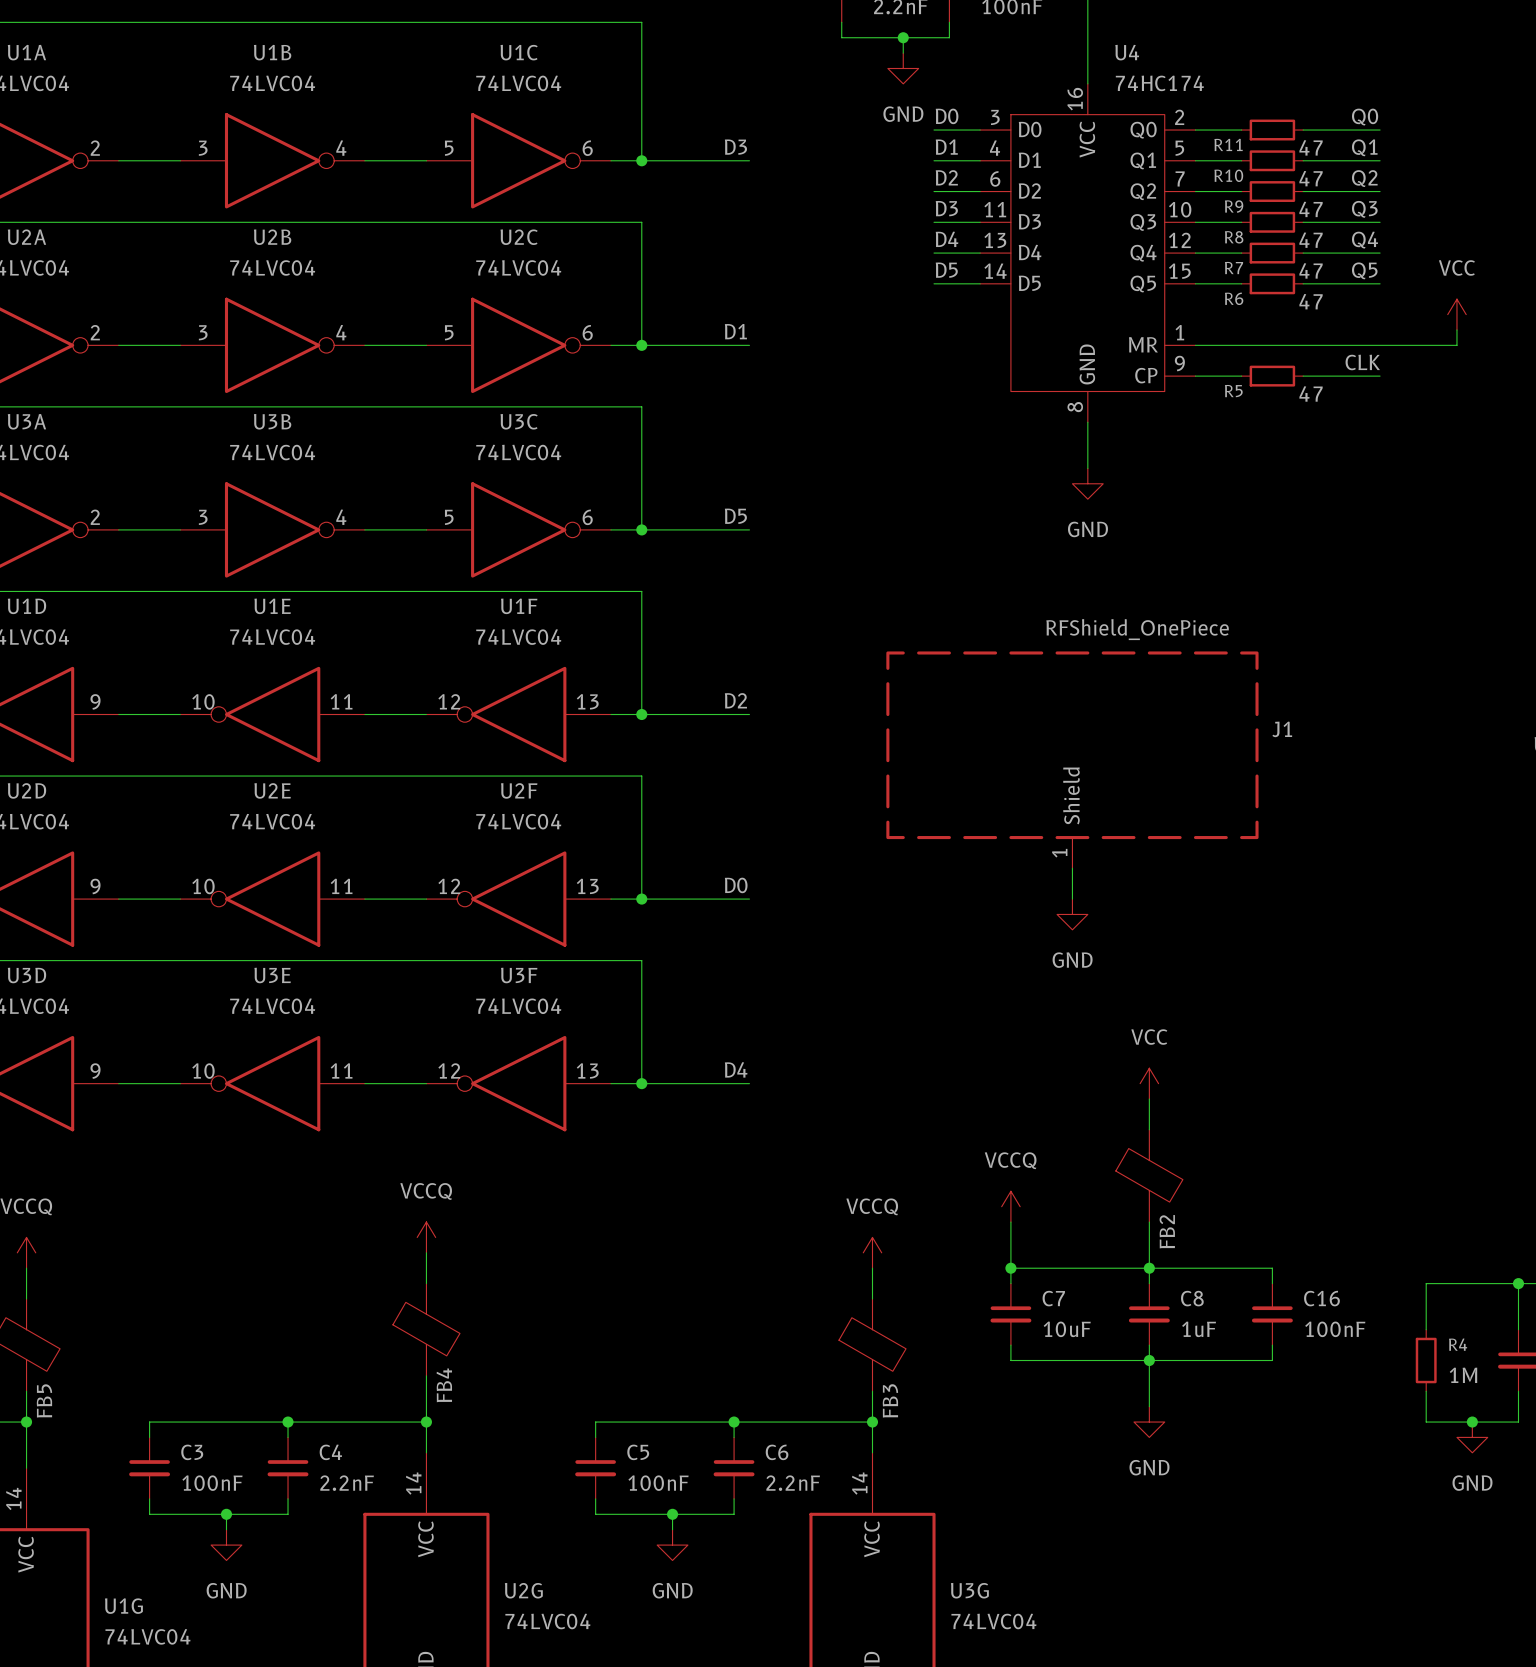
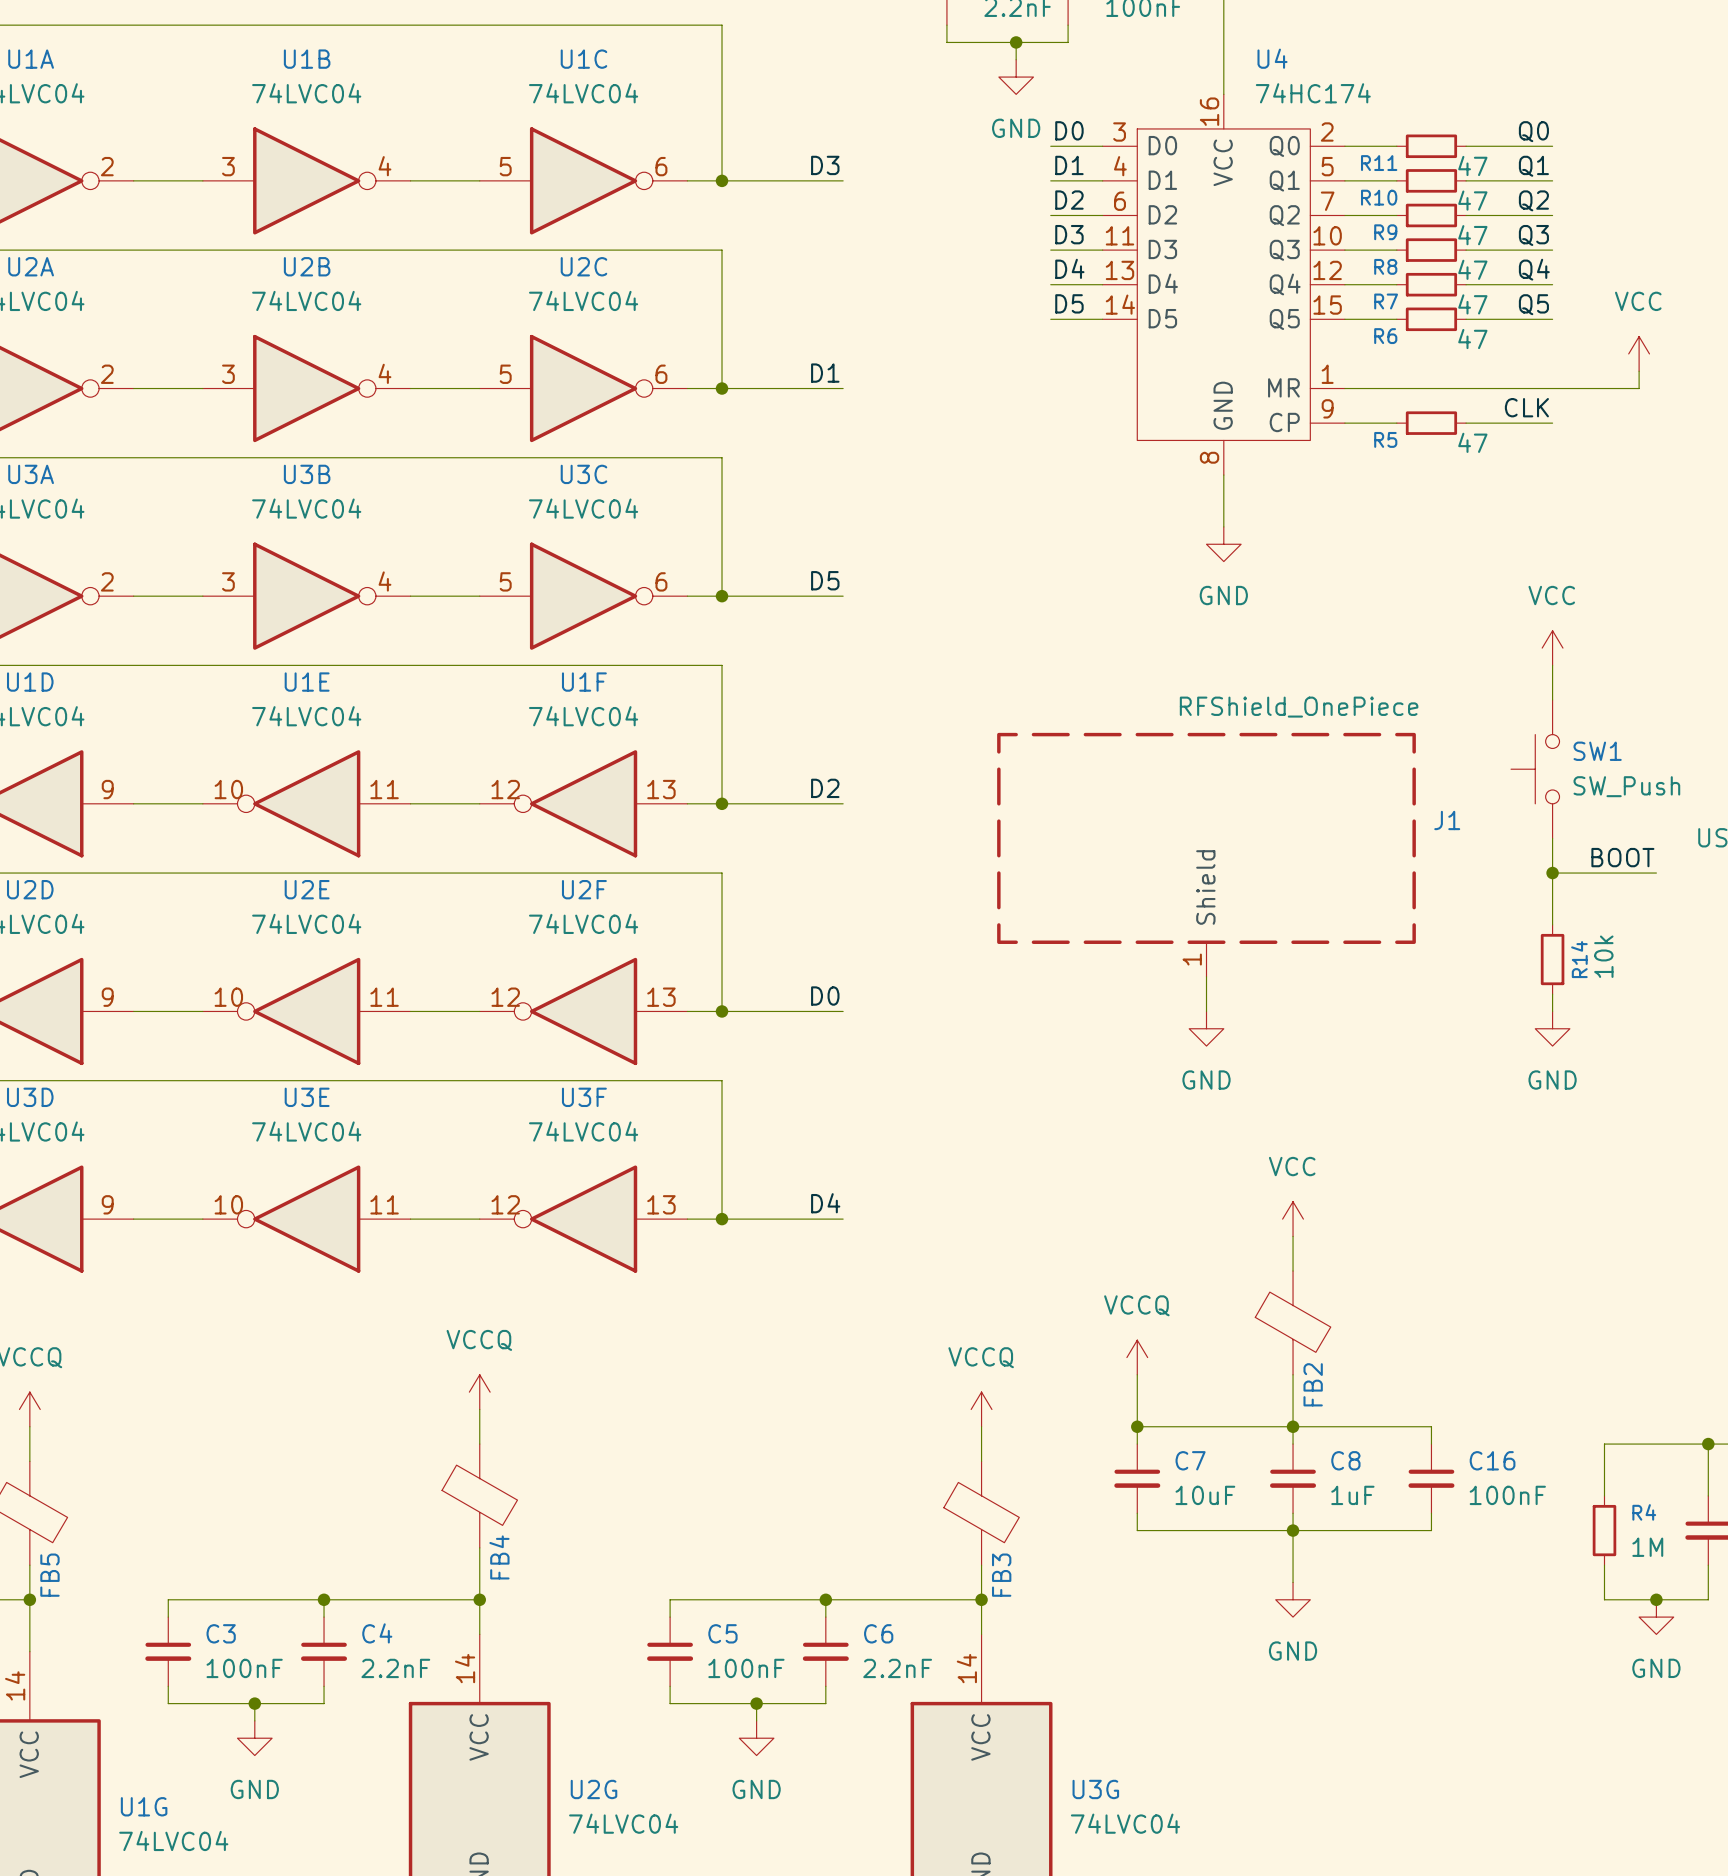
power symbol: none -> VCC (1552, 648)
wire: none -> (1552, 665) (1552, 699)
SW1: none -> SW_Push (1535, 769)
wire: none -> (1552, 838) (1552, 924)
label: none -> BOOT (1622, 857)
wire: none -> (1552, 873) (1656, 873)
junction: none -> (1552, 873)
R14: none -> 10k (1552, 959)
wire: none -> (1552, 994) (1552, 1011)
power symbol: none -> GND (1552, 1028)

